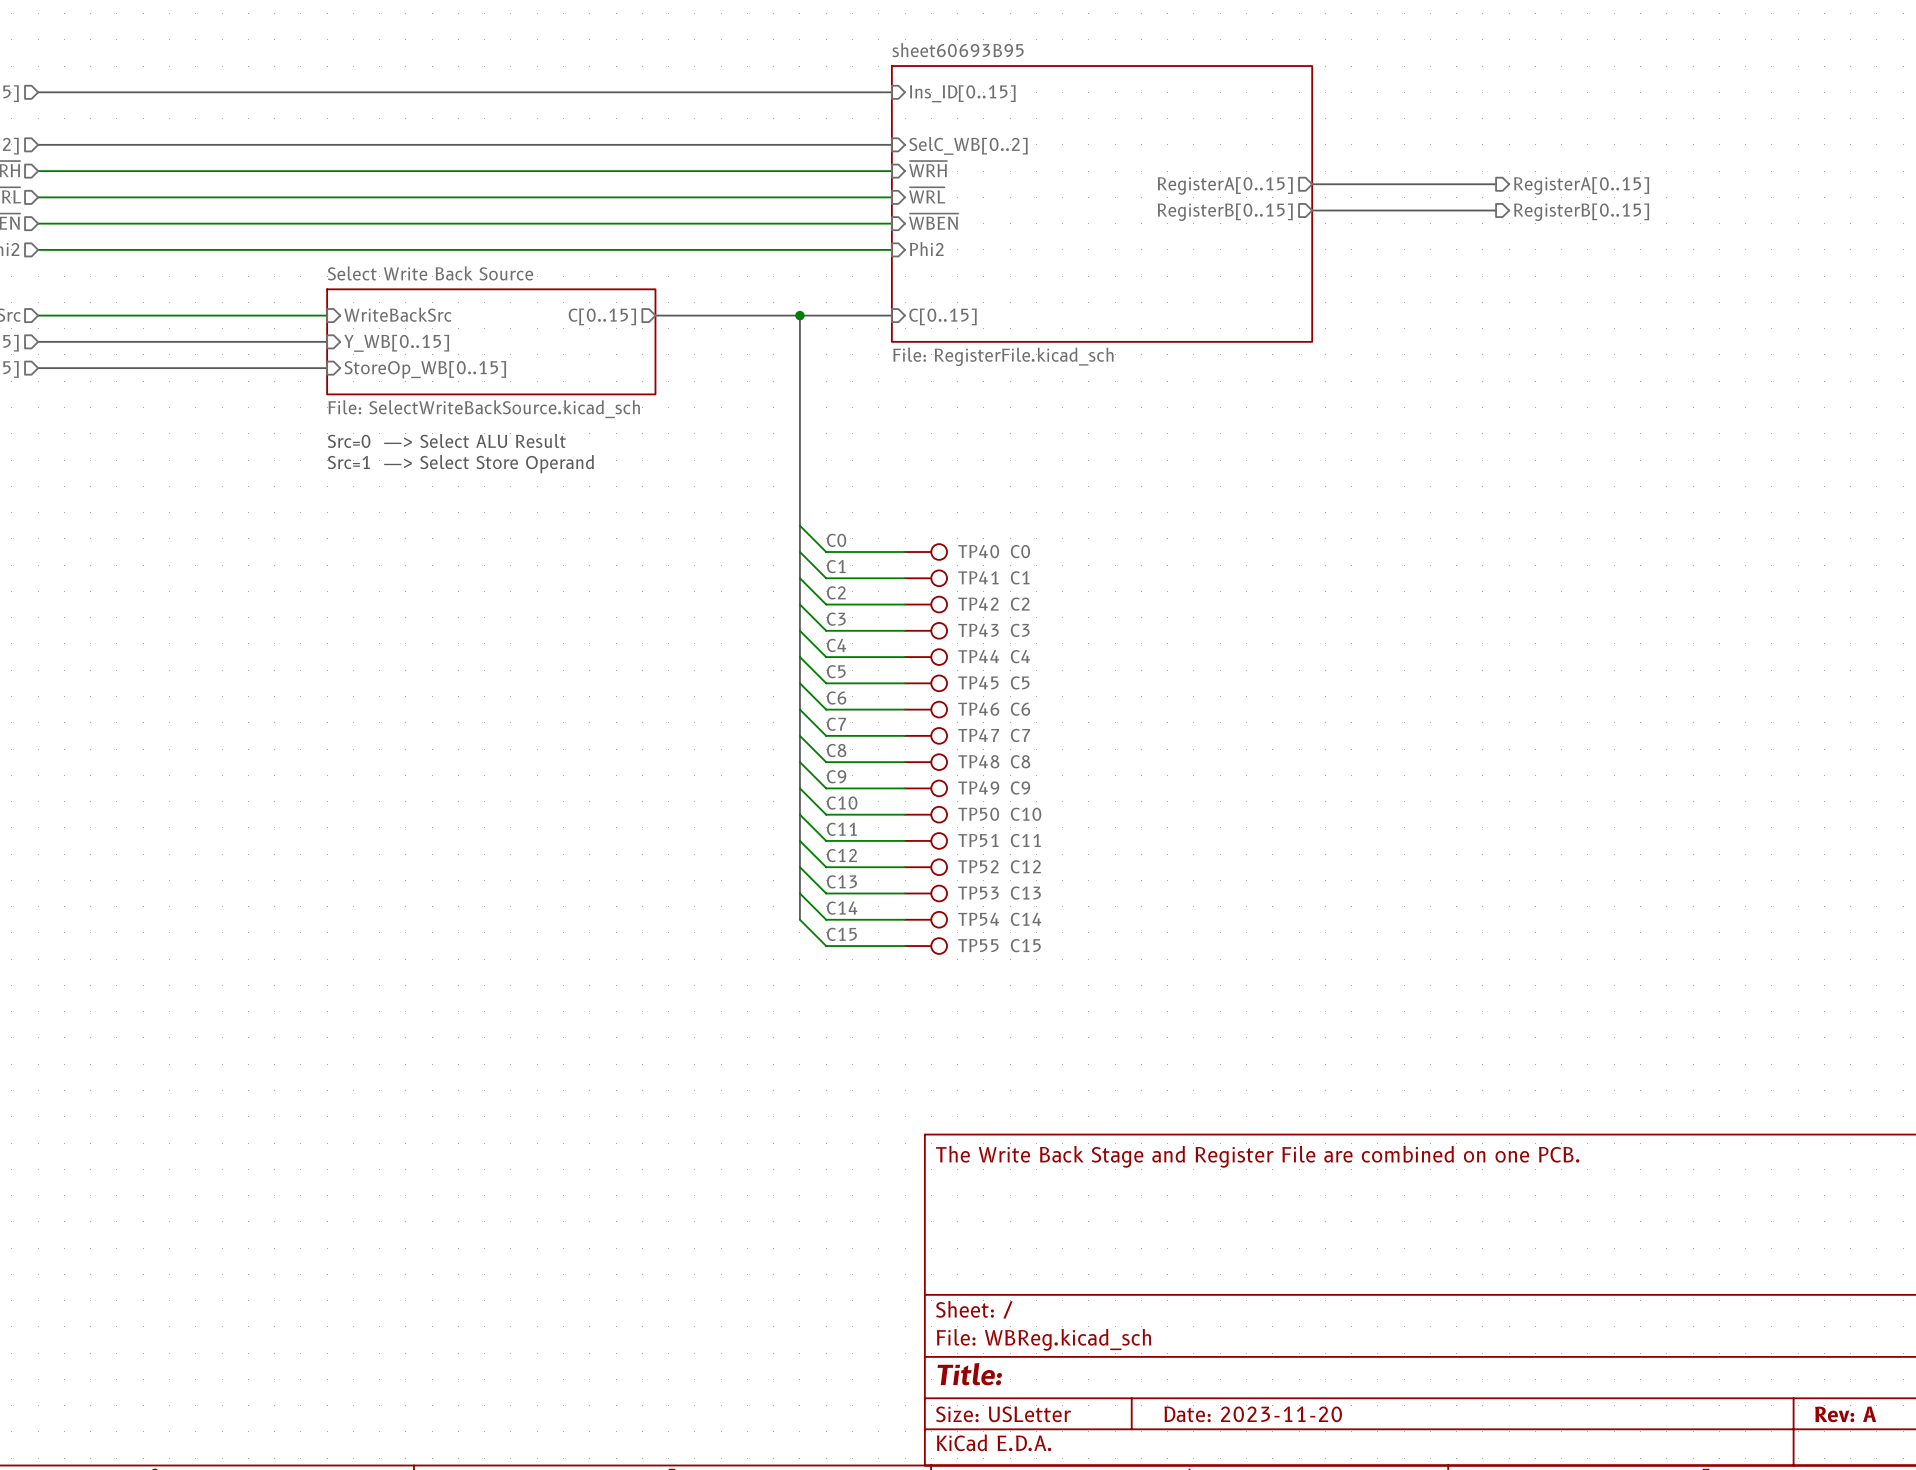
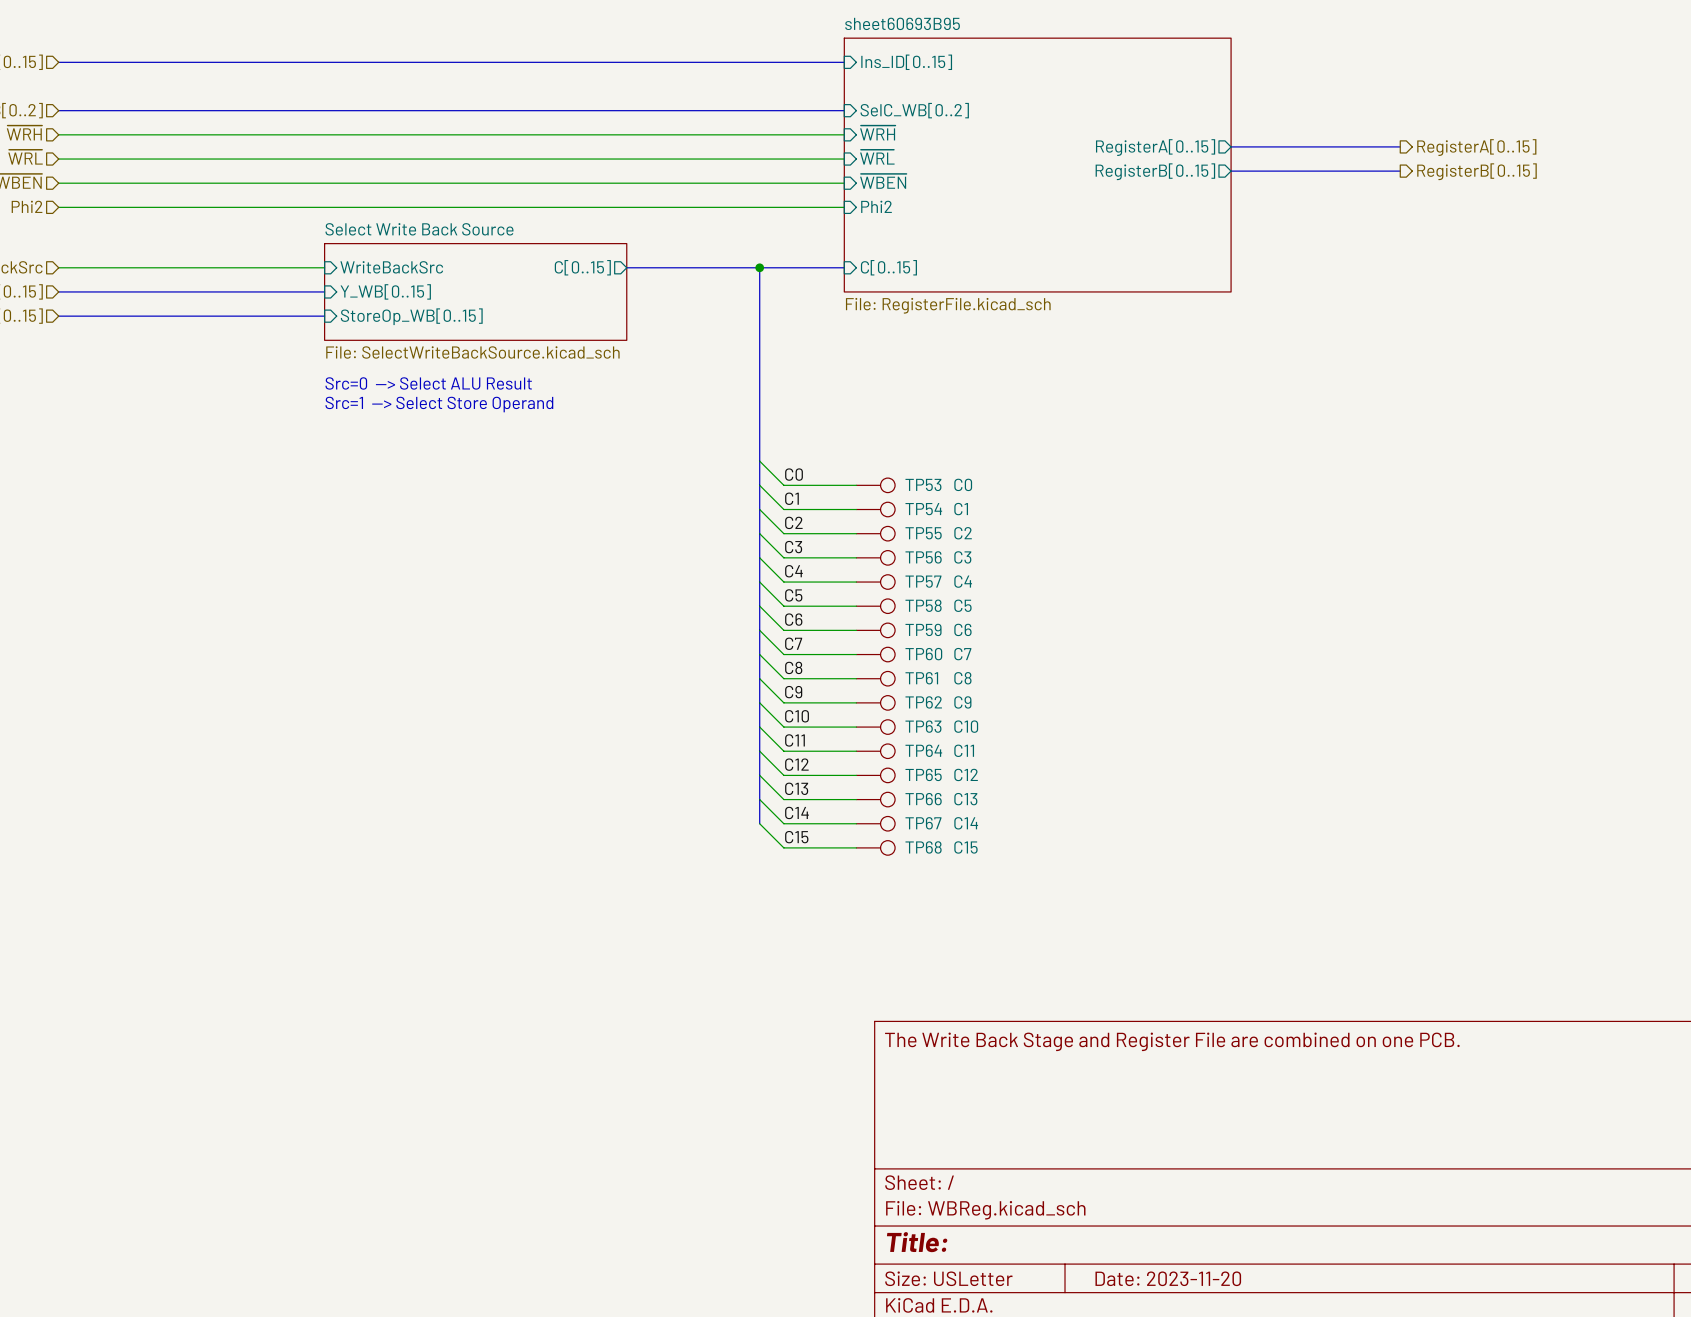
TP40 name: TP40 (978, 551) -> TP53 (923, 484)
TP41 name: TP41 (978, 577) -> TP54 (923, 509)
TP42 name: TP42 (978, 604) -> TP55 (923, 533)
TP43 name: TP43 (978, 630) -> TP56 (923, 557)
TP44 name: TP44 (978, 656) -> TP57 (923, 581)
TP45 name: TP45 (978, 682) -> TP58 (923, 605)
TP46 name: TP46 (978, 709) -> TP59 (923, 629)
TP47 name: TP47 (978, 735) -> TP60 (923, 654)
TP48 name: TP48 (978, 761) -> TP61 (921, 678)
TP49 name: TP49 (978, 788) -> TP62 (923, 702)
TP50 name: TP50 (978, 814) -> TP63 (923, 726)
TP51 name: TP51 (978, 840) -> TP64 (923, 750)
TP52 name: TP52 (978, 866) -> TP65 (923, 774)
TP53 name: TP53 (978, 893) -> TP66 (923, 799)
TP54 name: TP54 (978, 919) -> TP67 (923, 823)
TP55 name: TP55 (978, 945) -> TP68 (923, 847)

